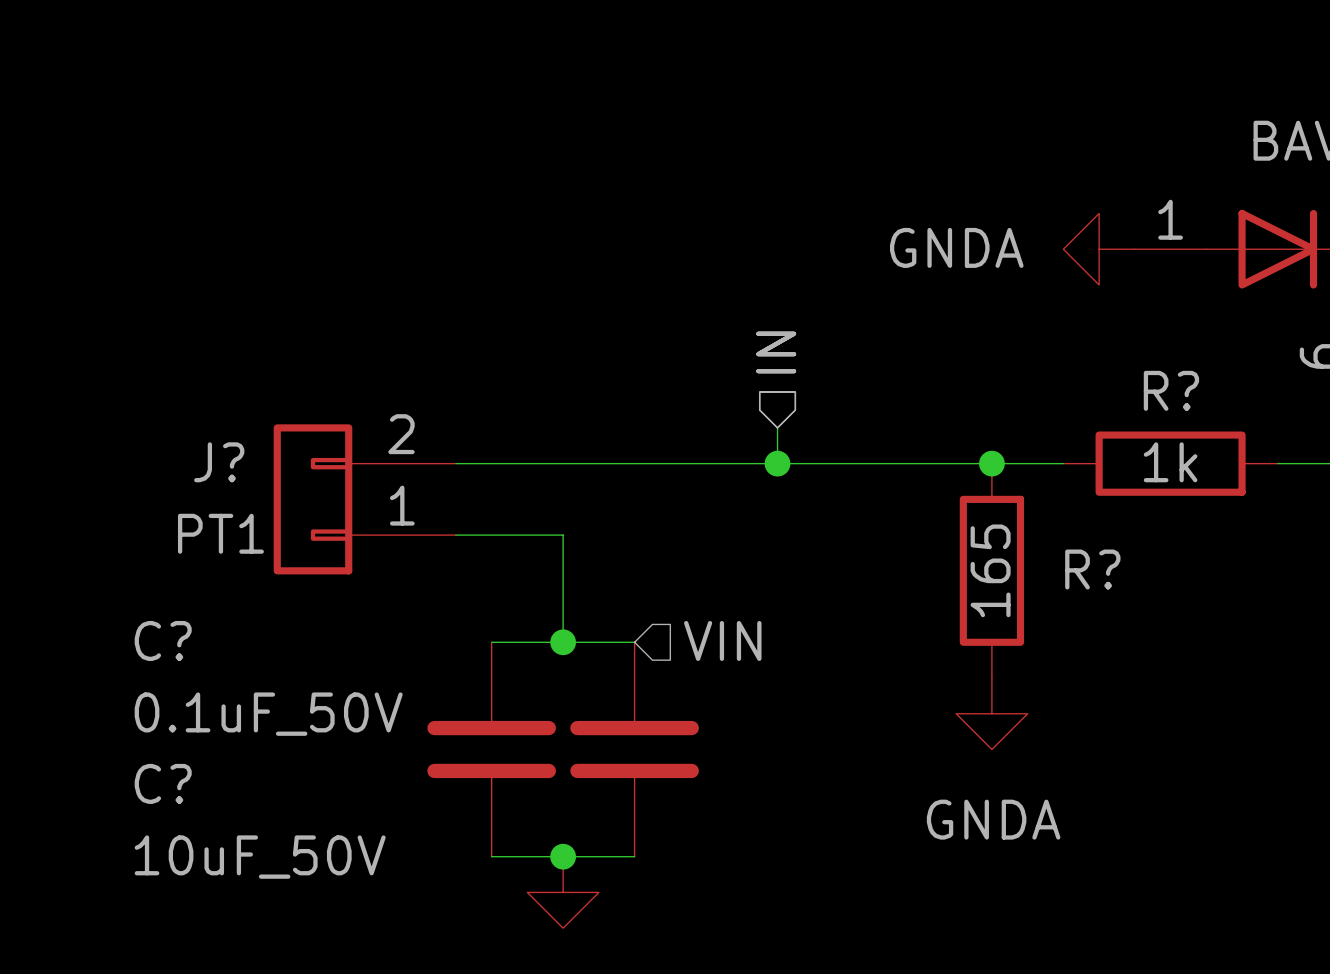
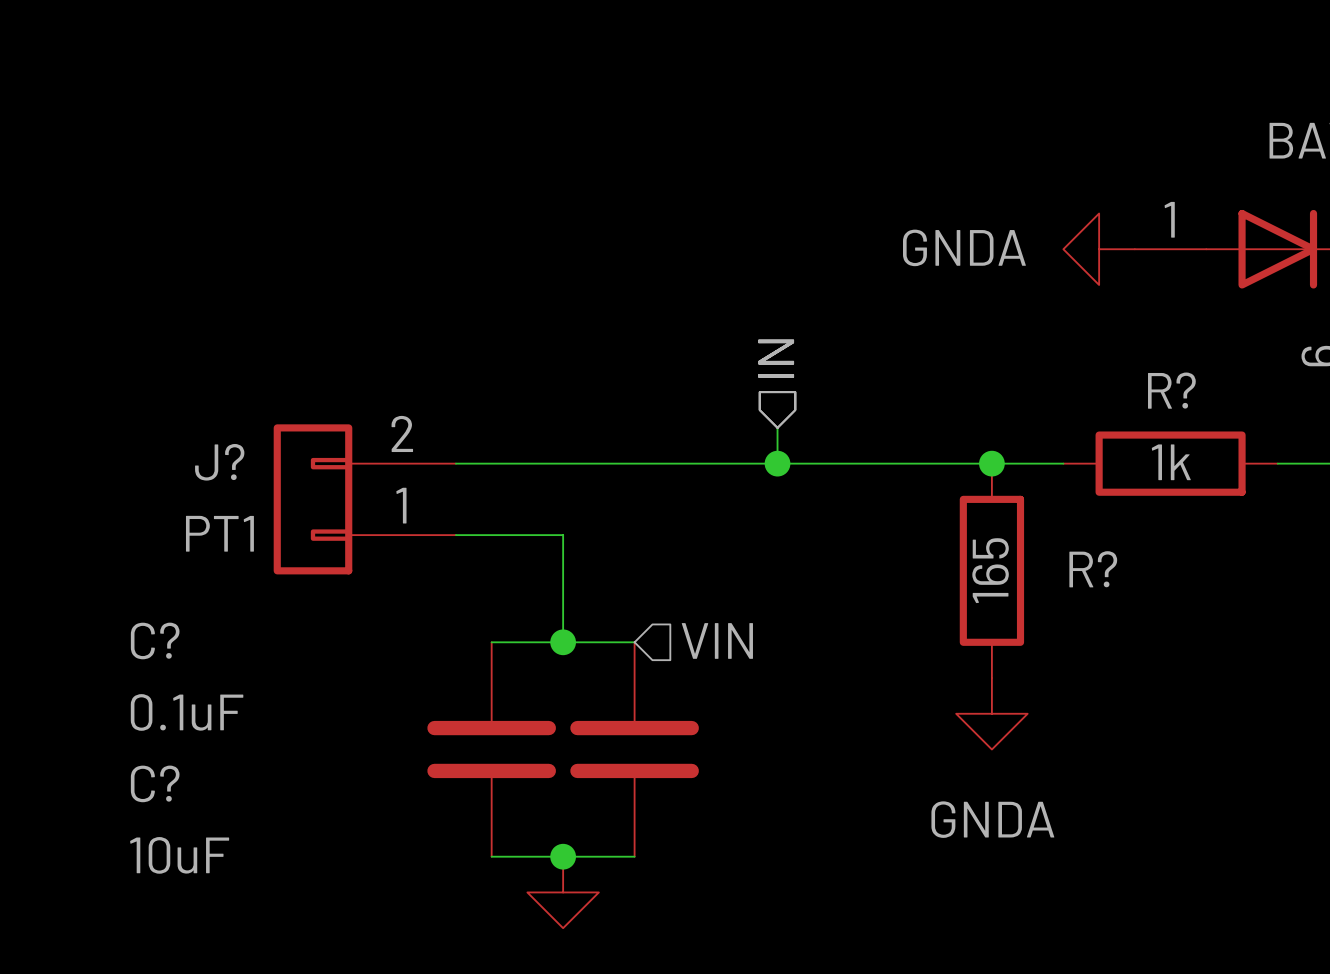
C? value: 0.1uF_50V (268, 714) -> 0.1uF (187, 712)
C? value: 10uF_50V (260, 857) -> 10uF (179, 855)

